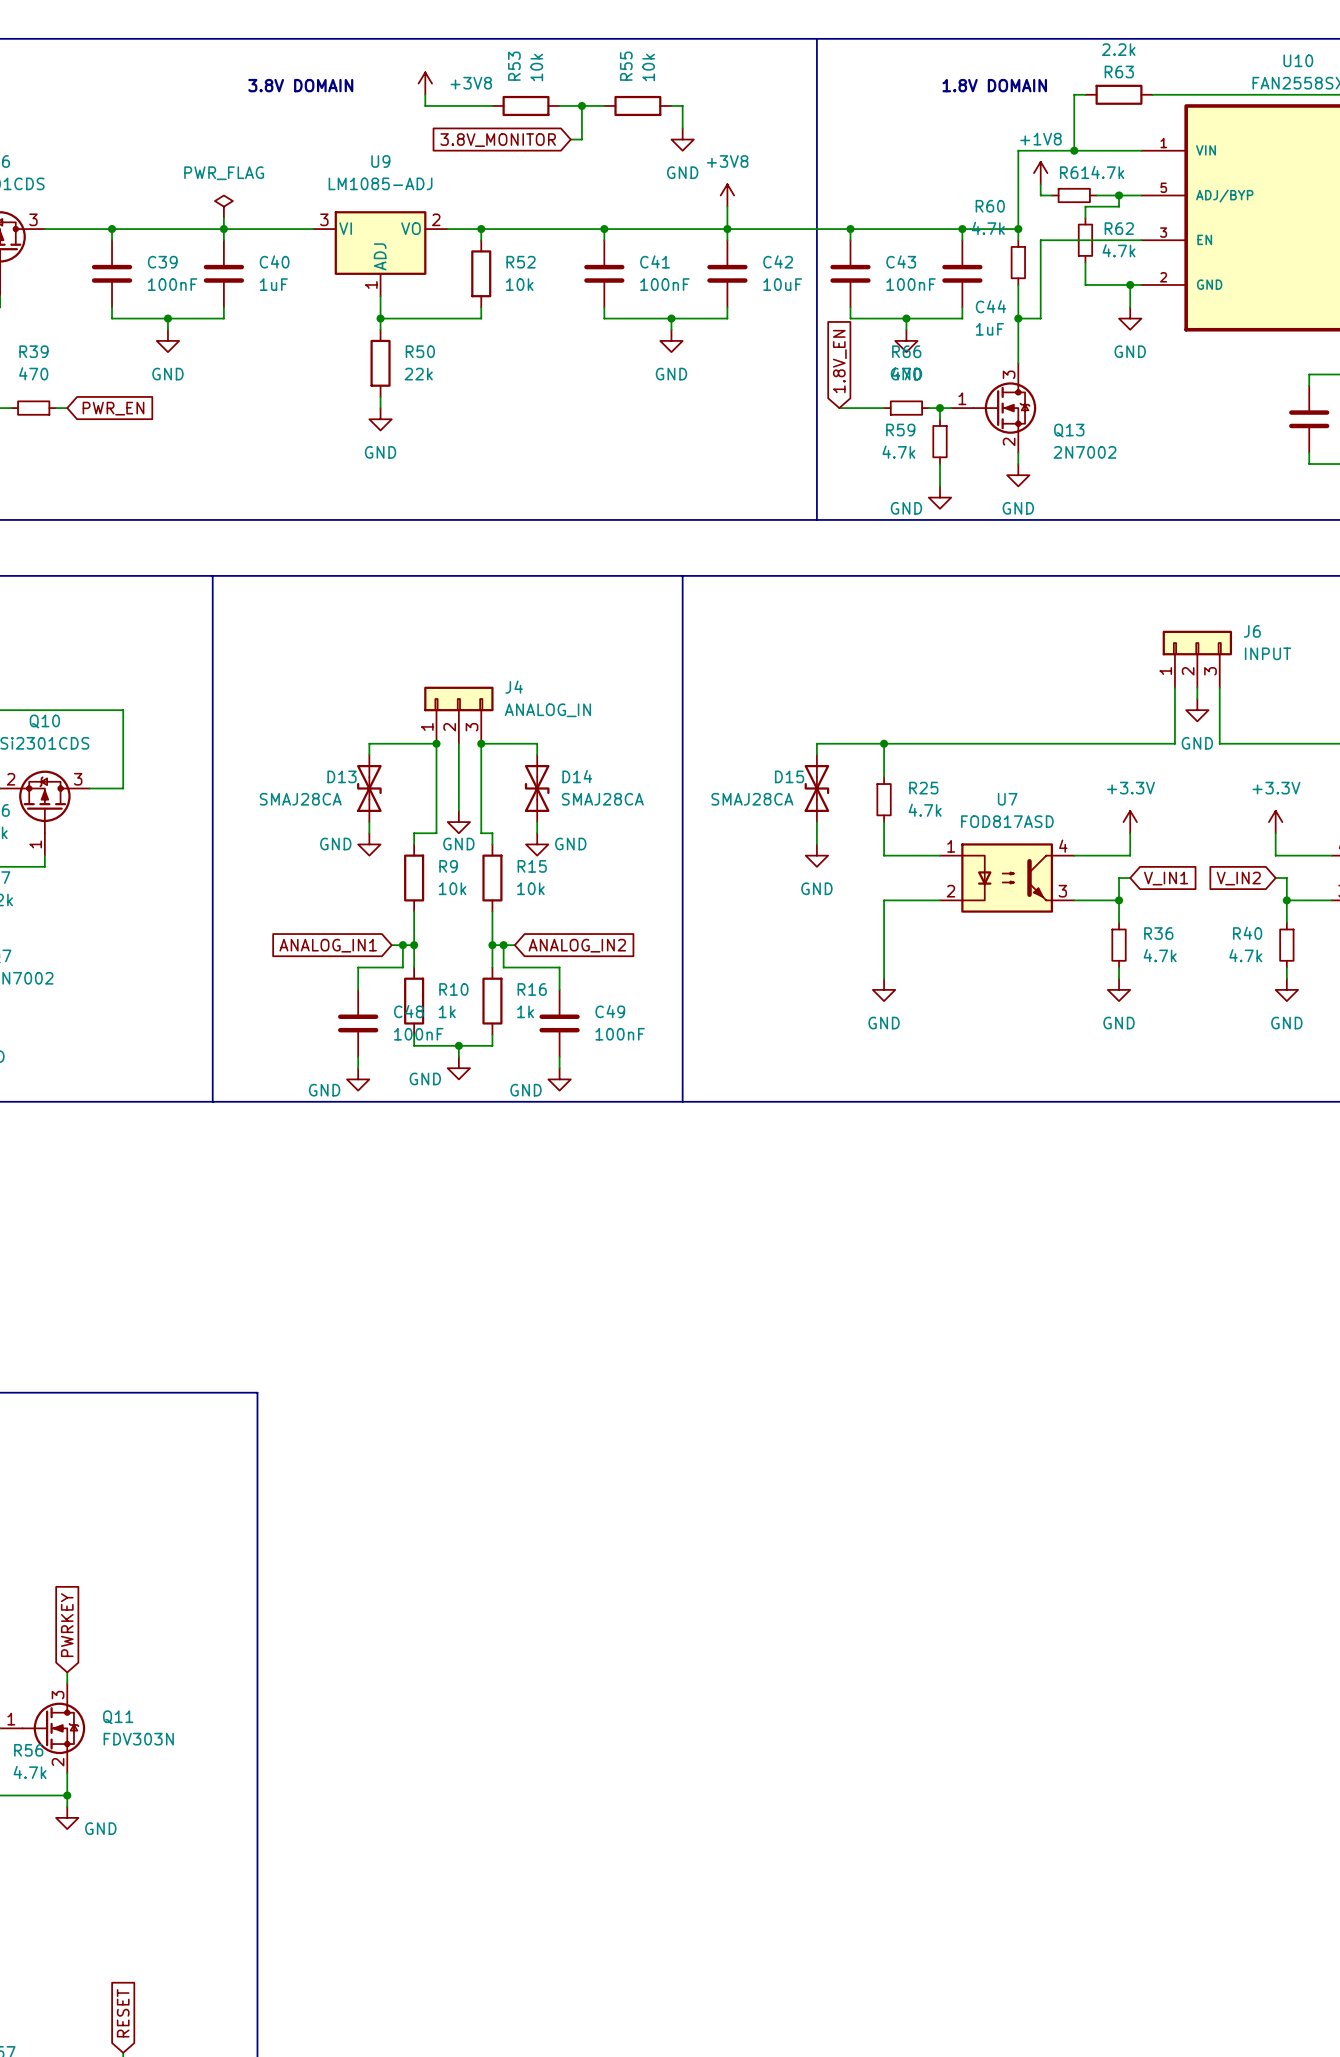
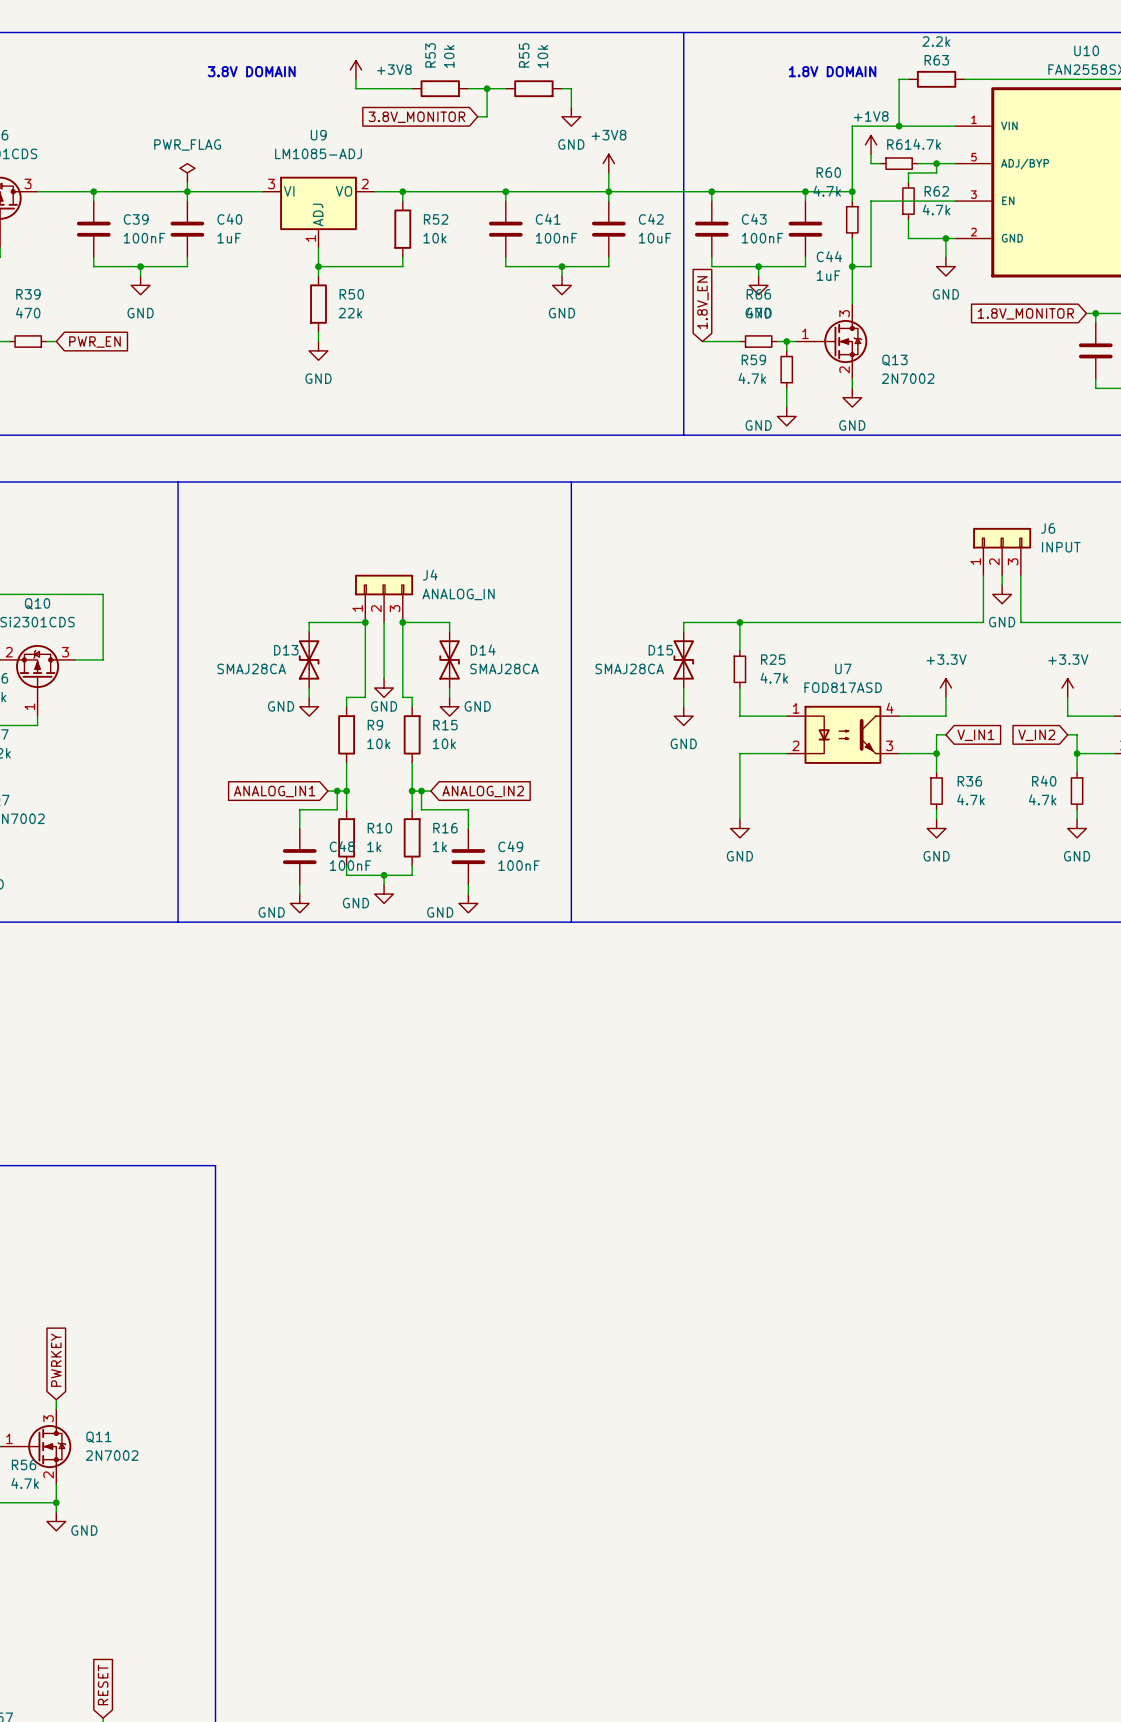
wire: none -> (1086, 313) (1095, 313)
junction: none -> (1095, 313)
global label: none -> 1.8V_MONITOR (1025, 313)
Q11 value: FDV303N (138, 1739) -> 2N7002 (112, 1455)

